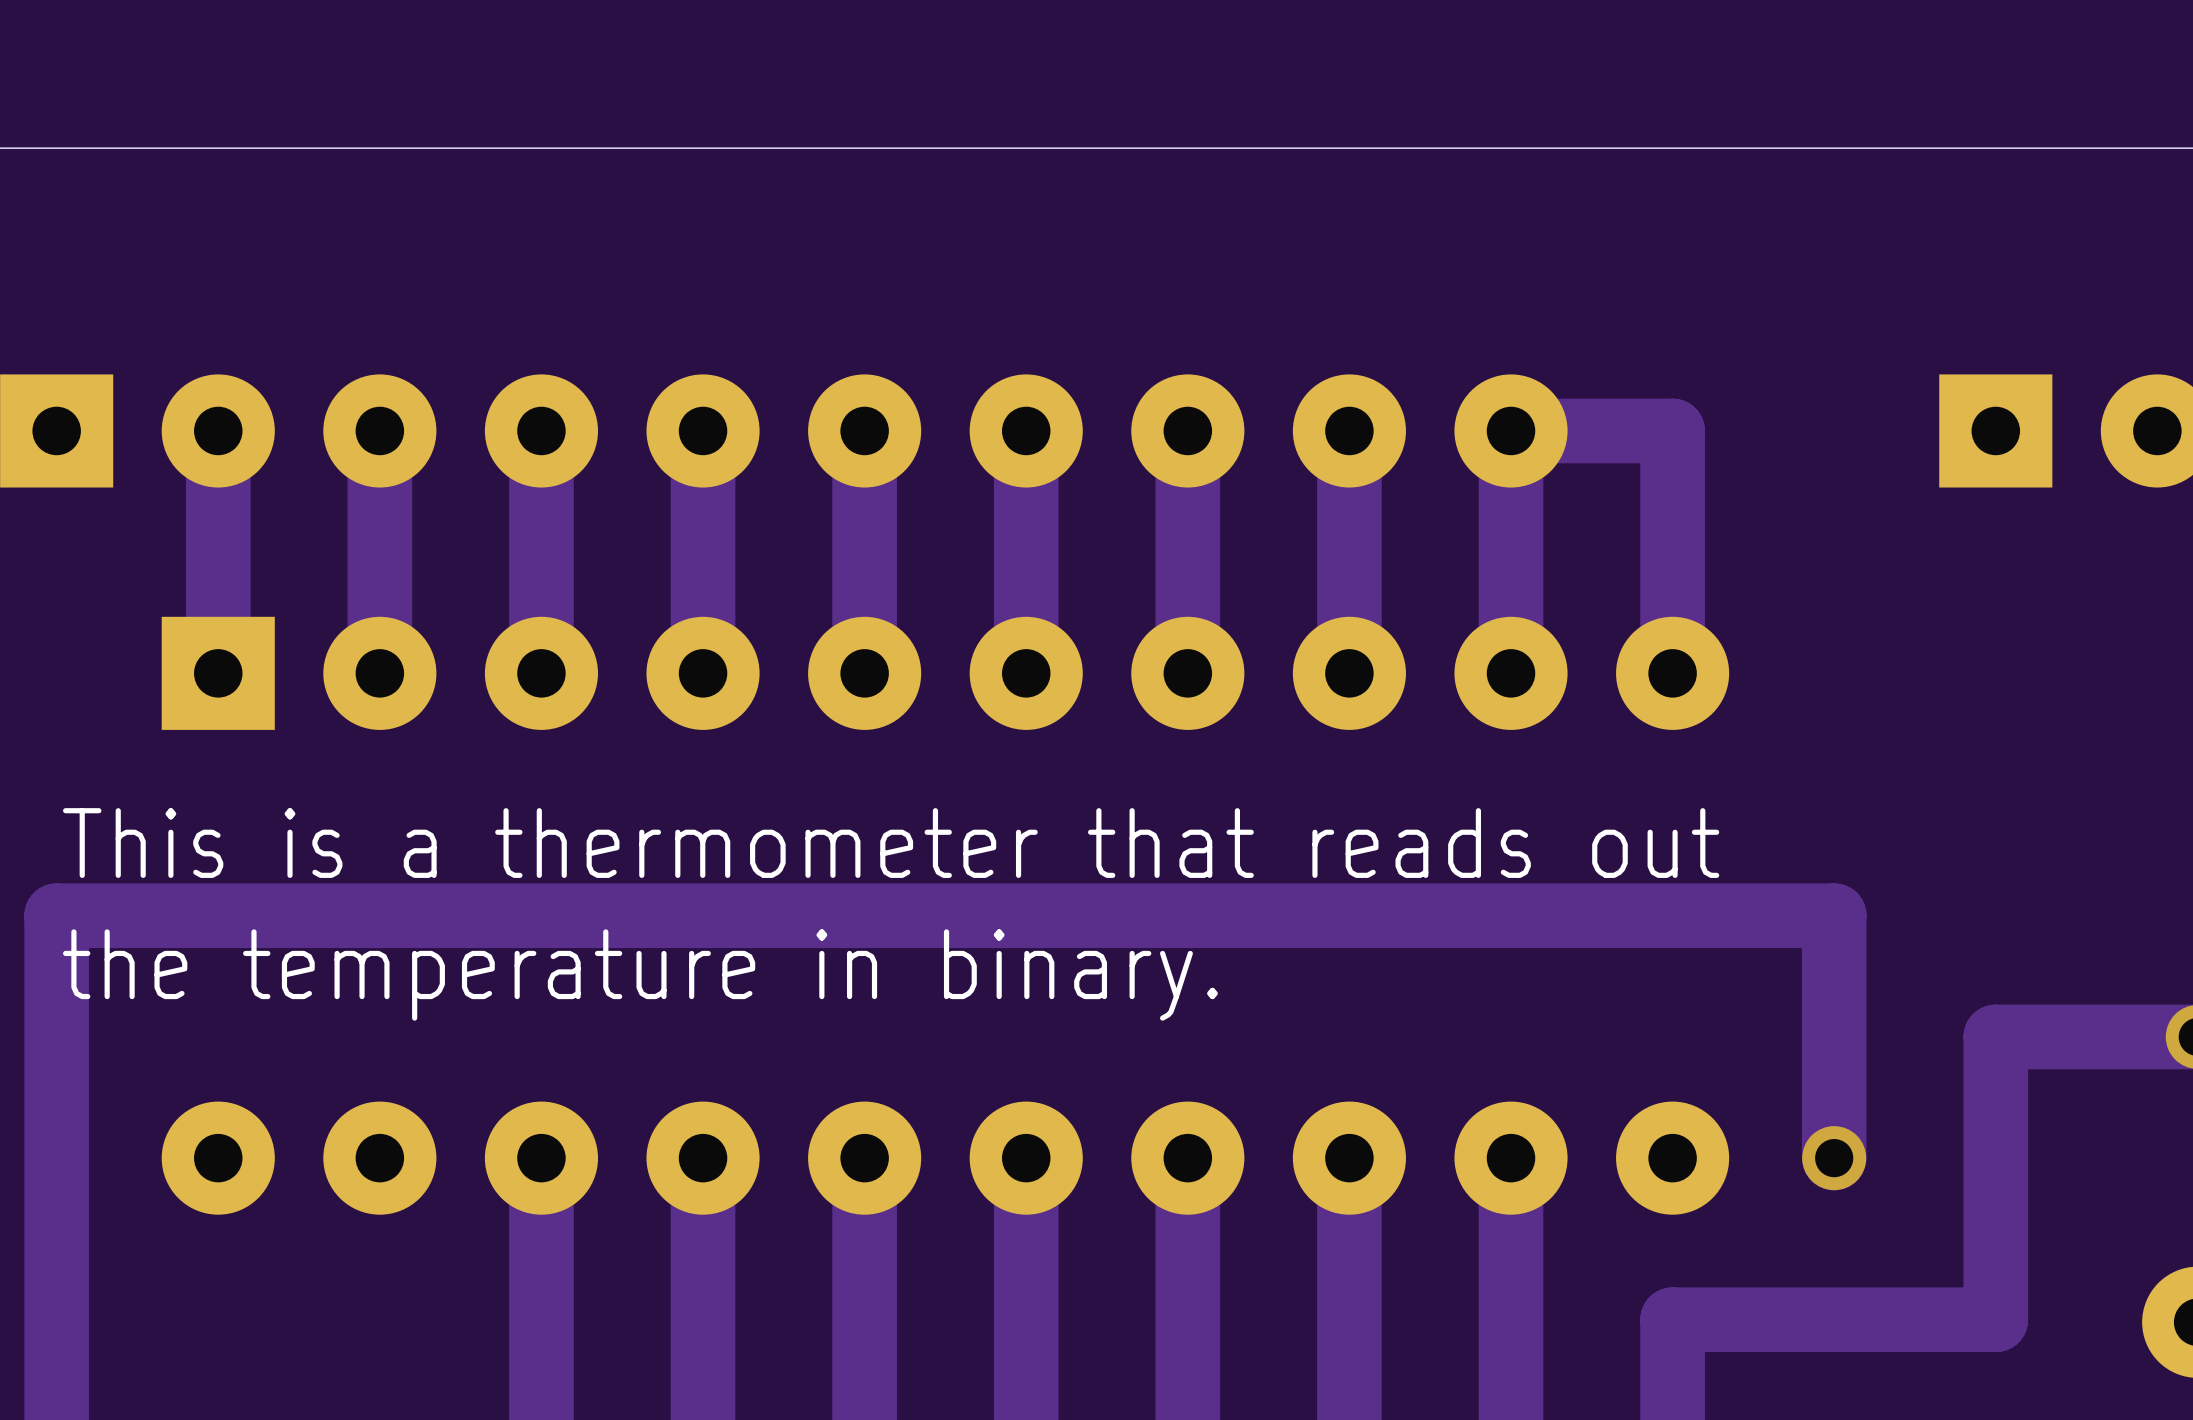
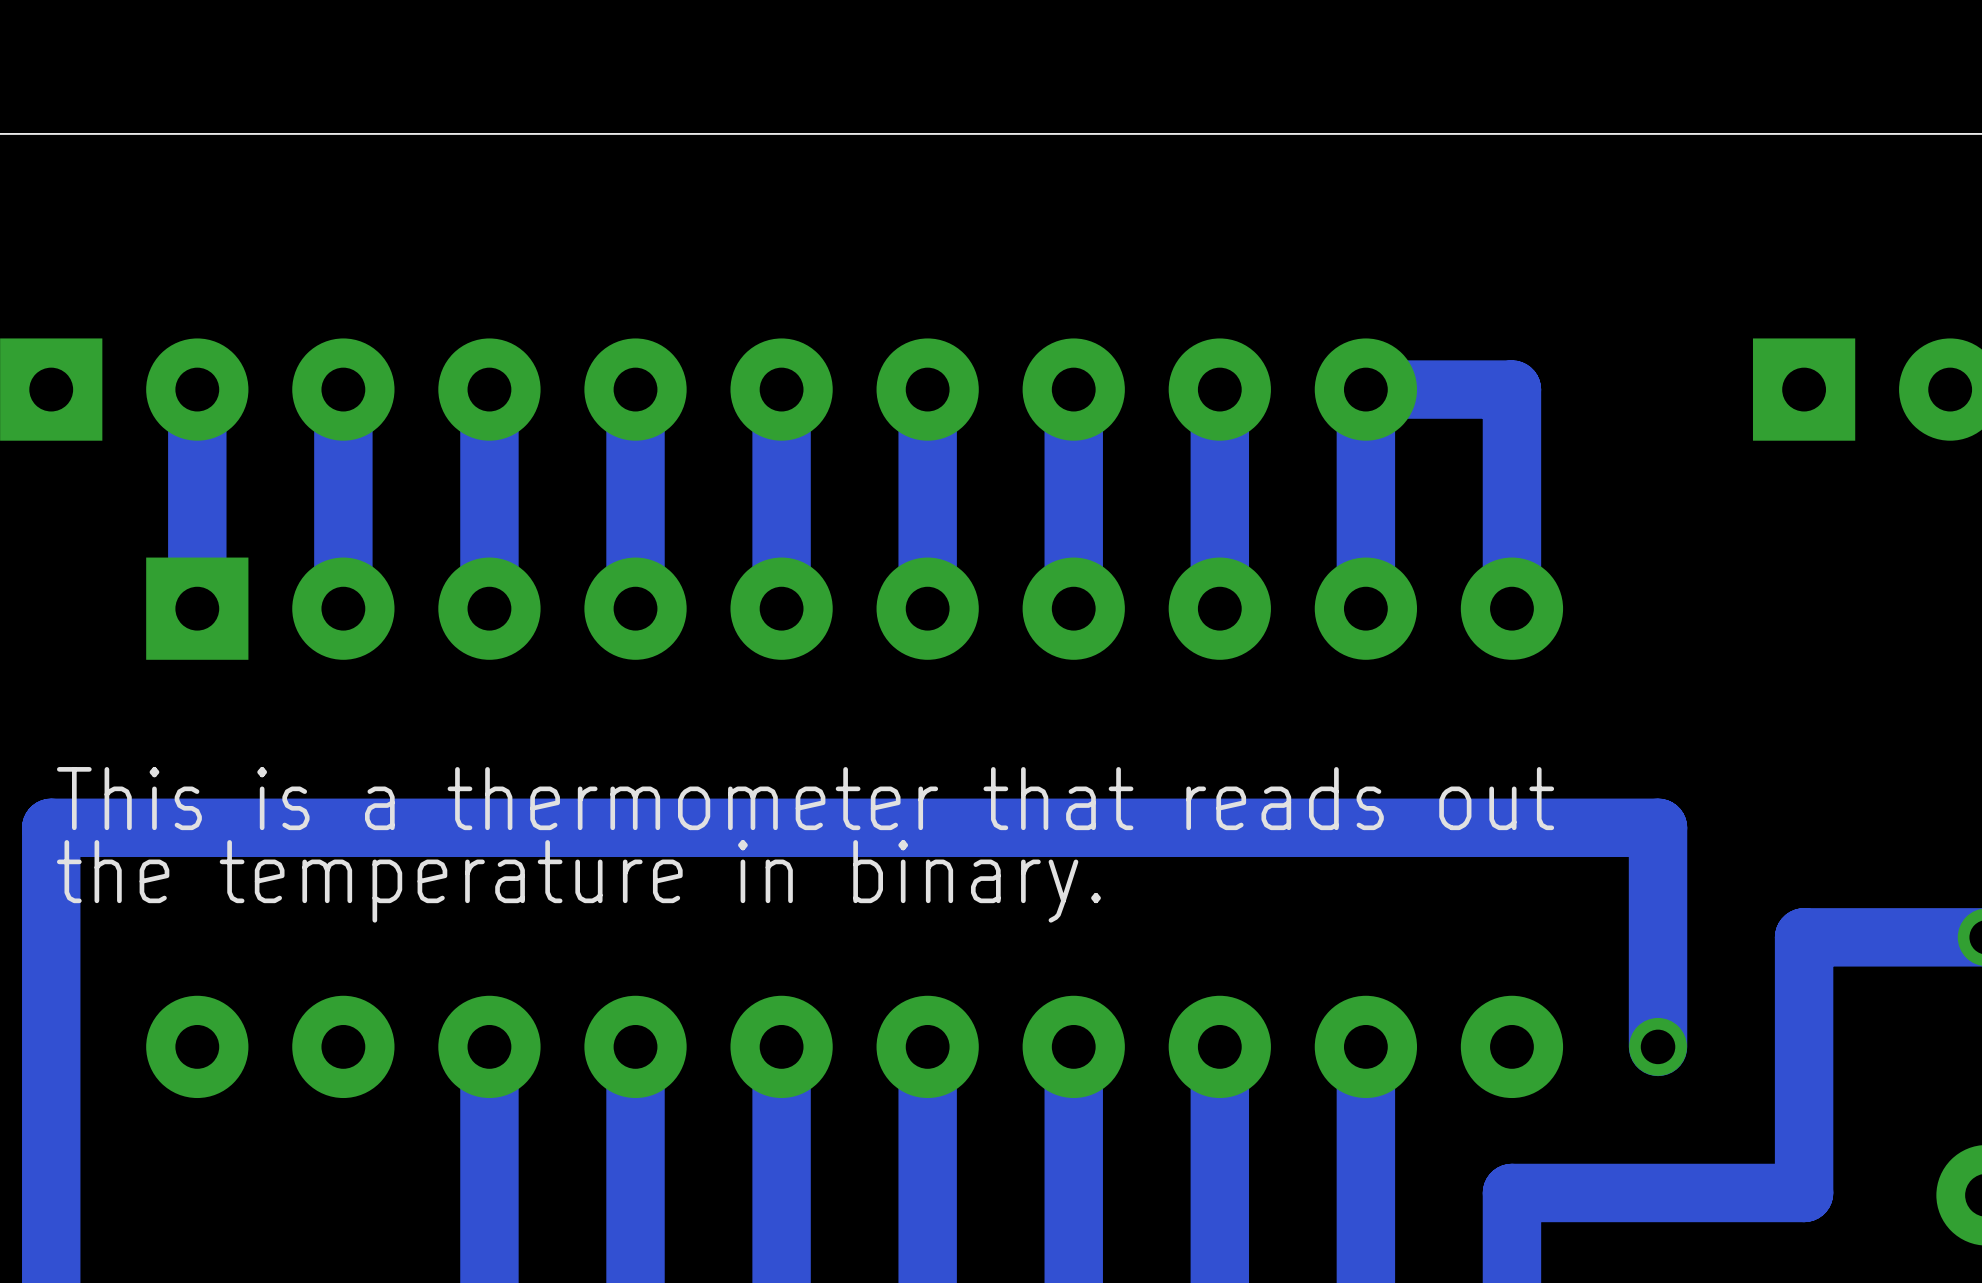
text position: This is a thermometer that reads out (891, 843) -> This is a thermometer that reads out (805, 798)

